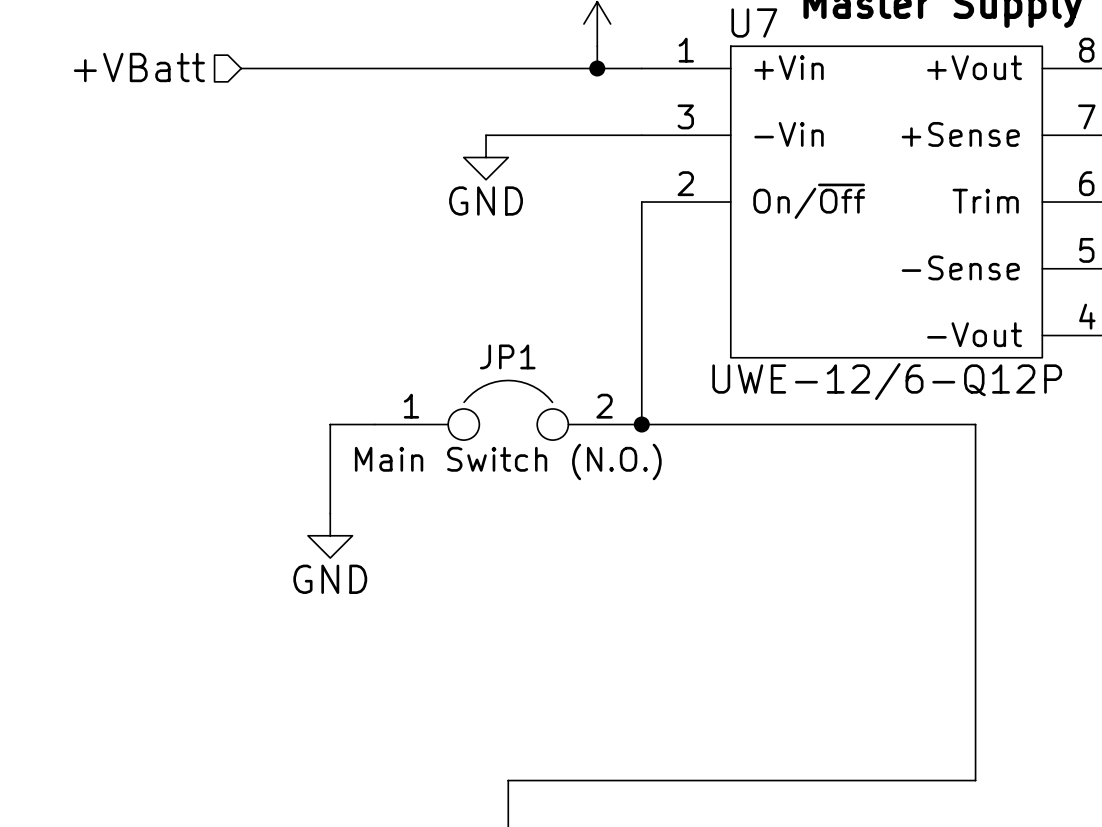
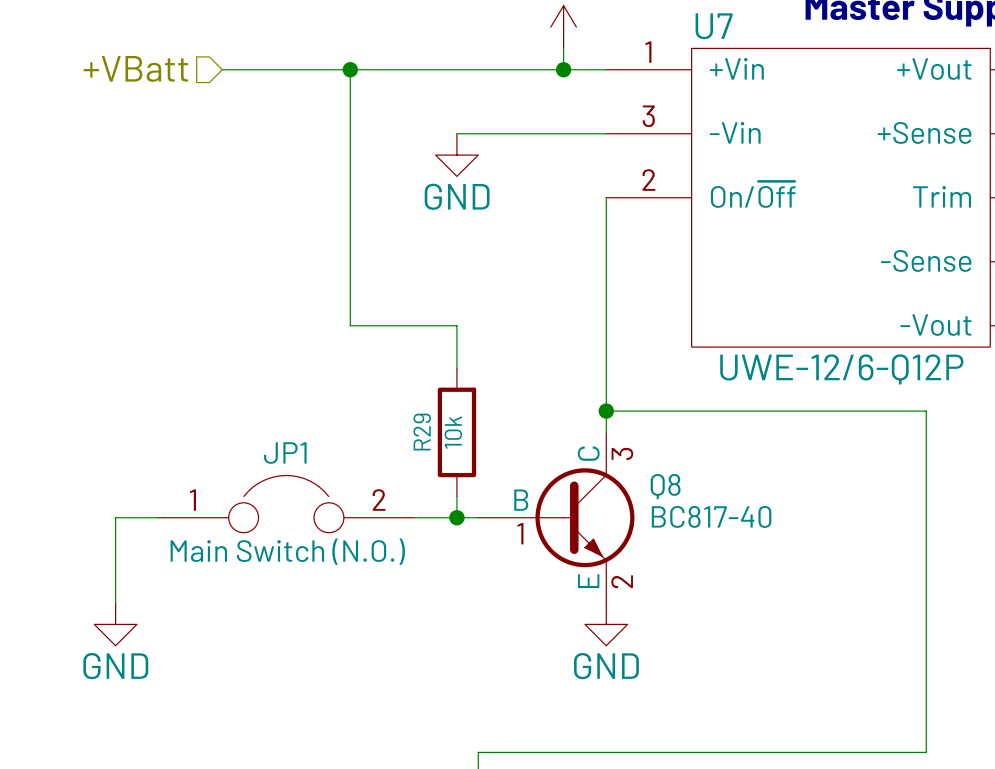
wire: none -> (350, 69) (350, 325) (456, 325) (456, 368)
junction: none -> (350, 69)
JP1 position: (508, 410) -> (286, 504)
wire: (374, 424) (330, 424) (330, 513) -> (158, 517) (115, 517) (115, 603)
wire: none -> (606, 411) (606, 432)
R29: none -> 10k (456, 432)
wire: none -> (456, 496) (456, 517)
power symbol: GND (330, 535) -> none
wire: none -> (414, 517) (478, 517)
junction: none -> (456, 517)
Q8: none -> BC817-40 (556, 517)
power symbol: none -> GND (115, 624)
power symbol: none -> GND (606, 624)

